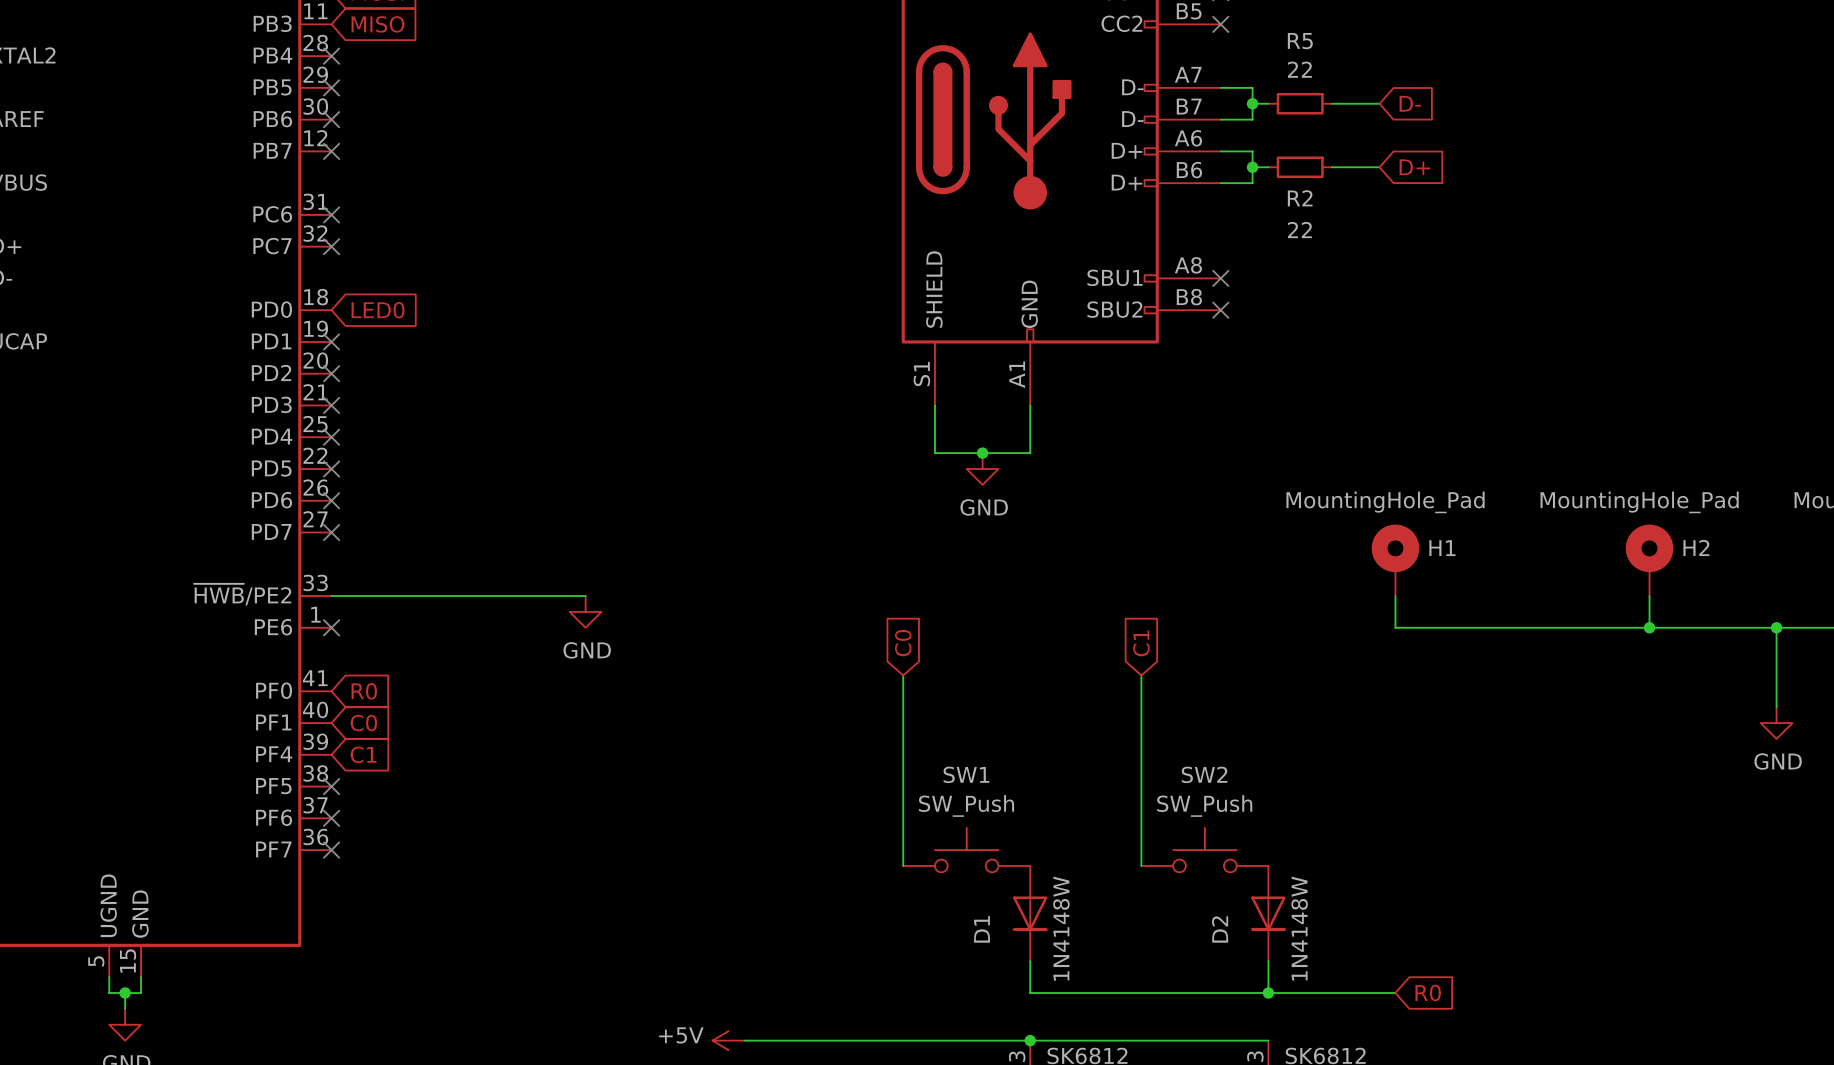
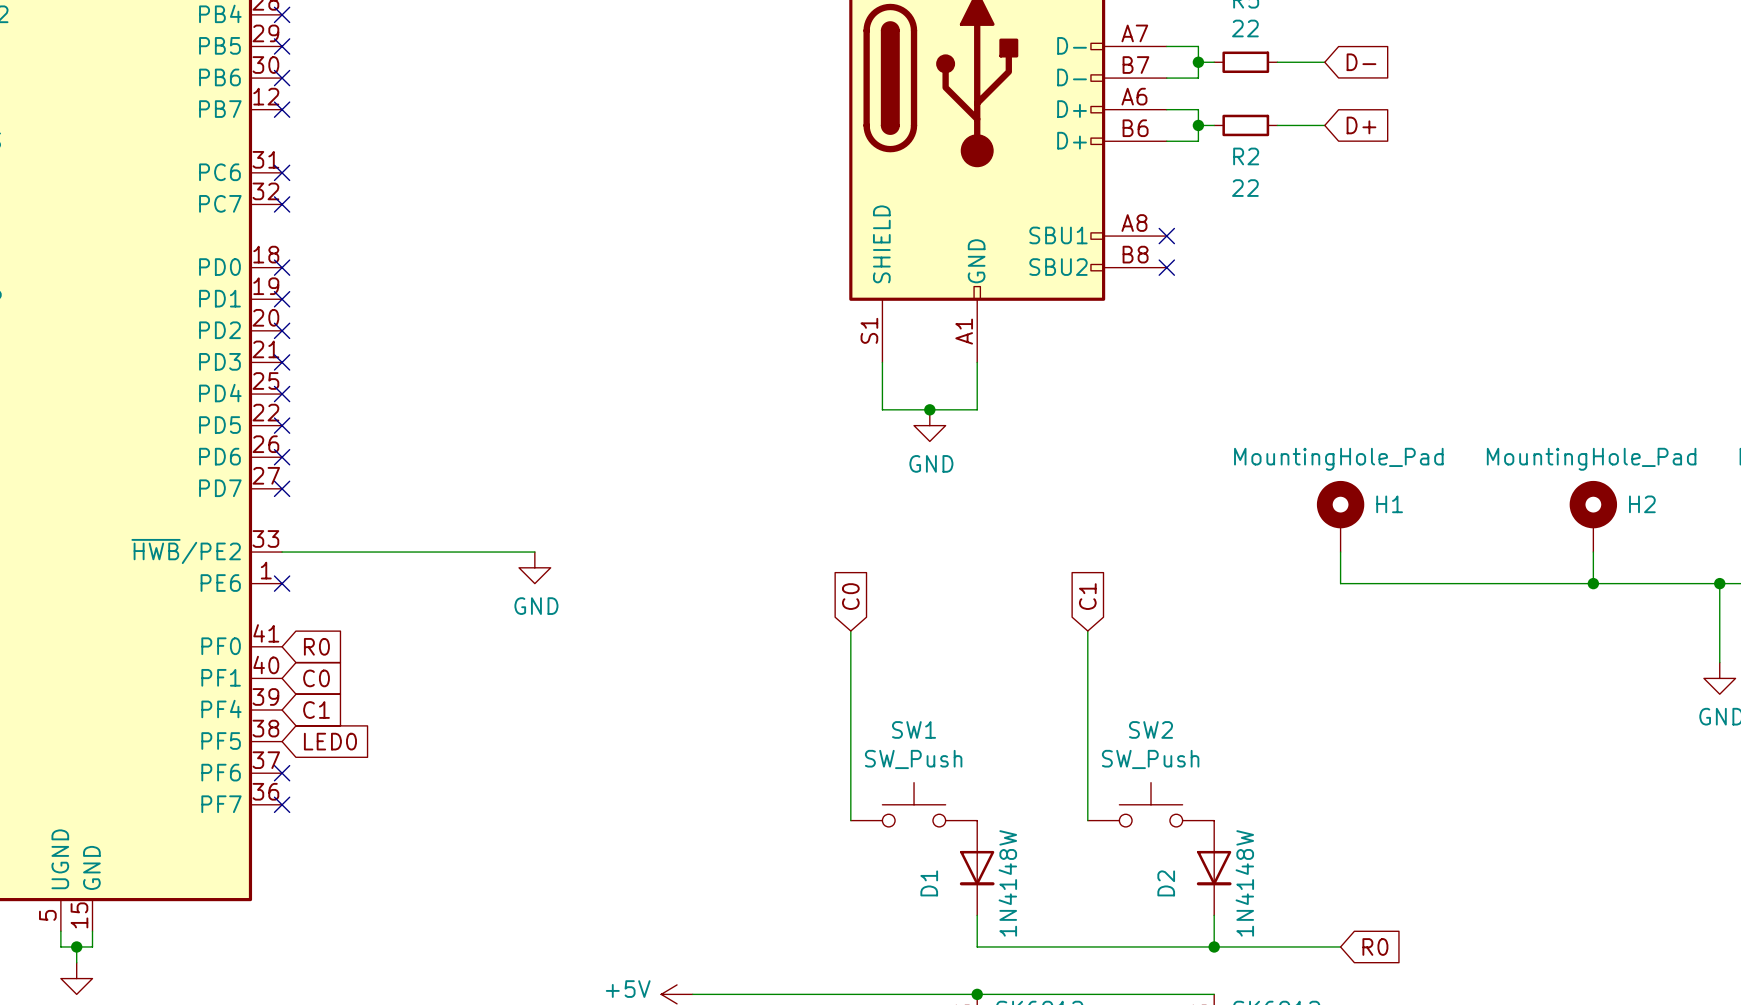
no-connect mark: none -> (282, 267)
global label: LED0 (378, 310) -> none
no-connect mark: (331, 786) -> none
global label: none -> LED0 (330, 741)

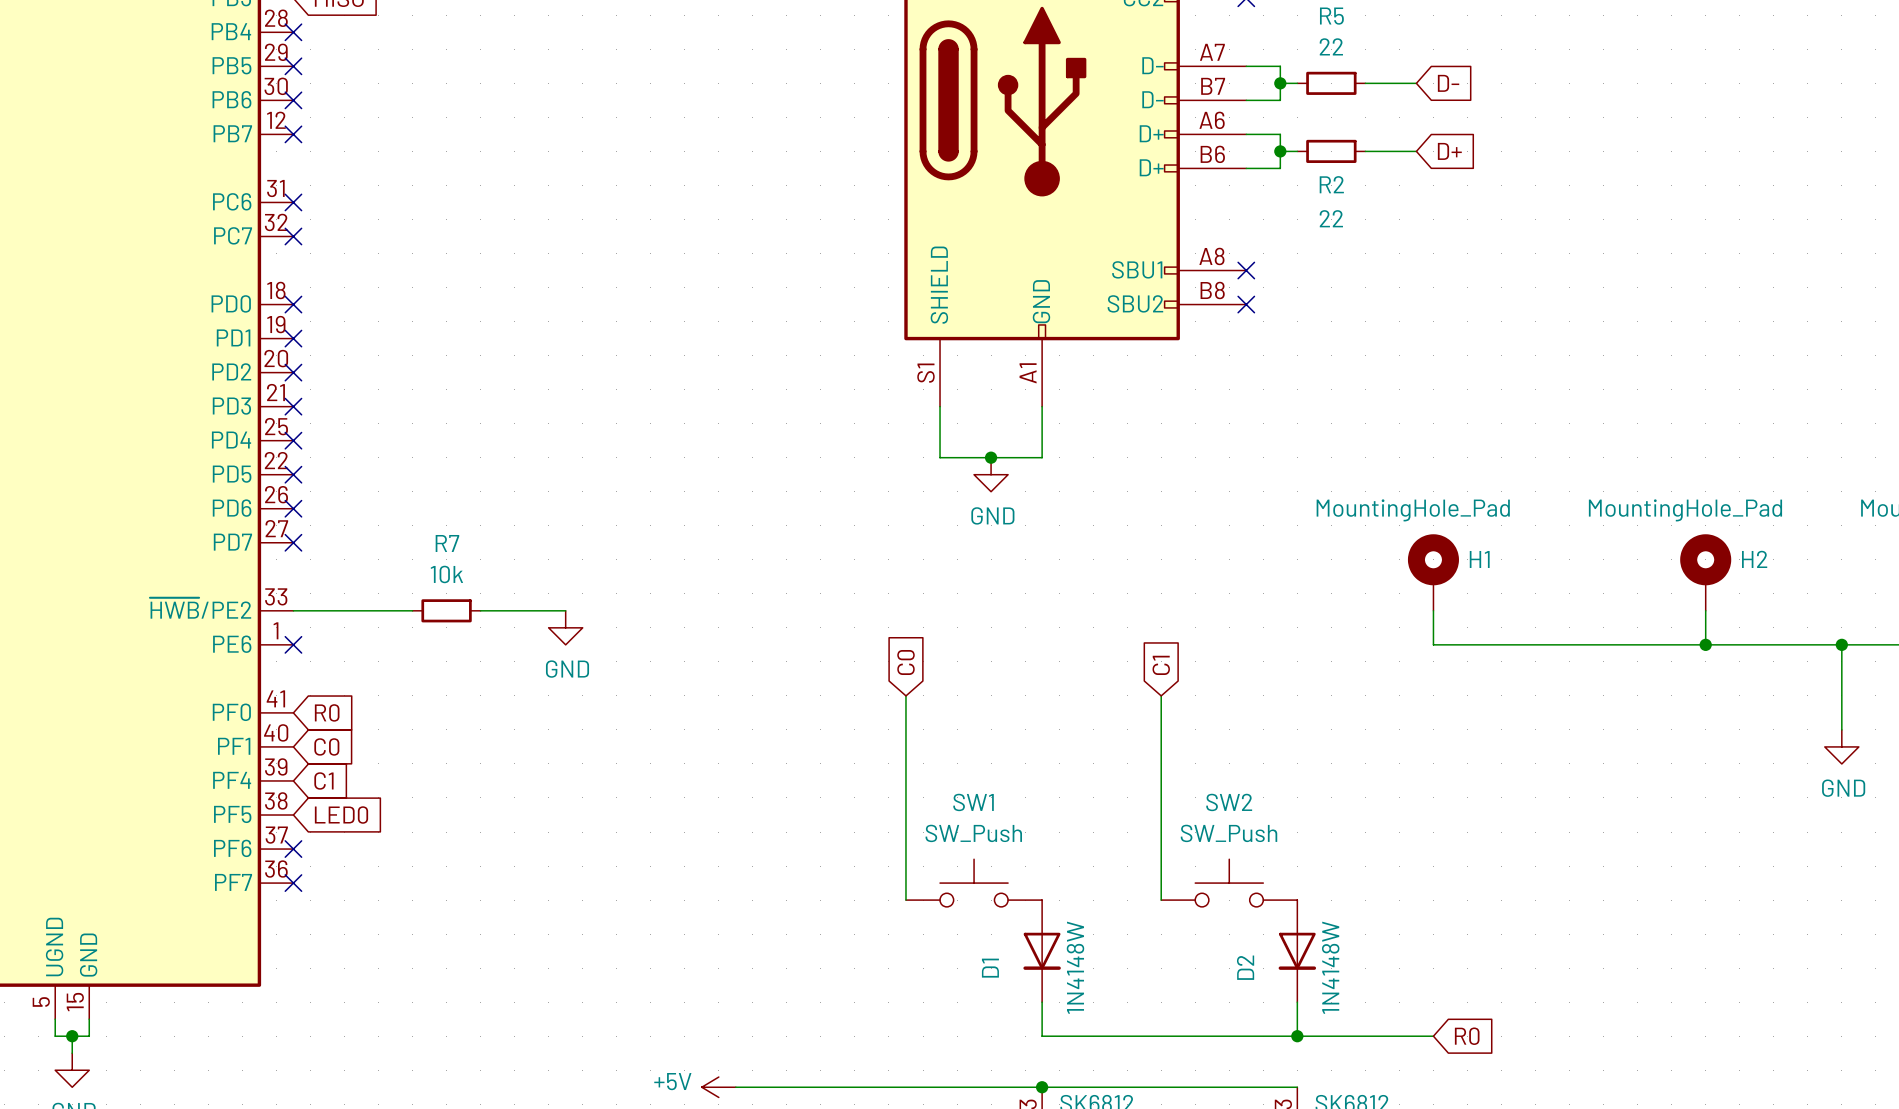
wire: (392, 552) (455, 552) -> none
R7: none -> 10k (446, 610)

